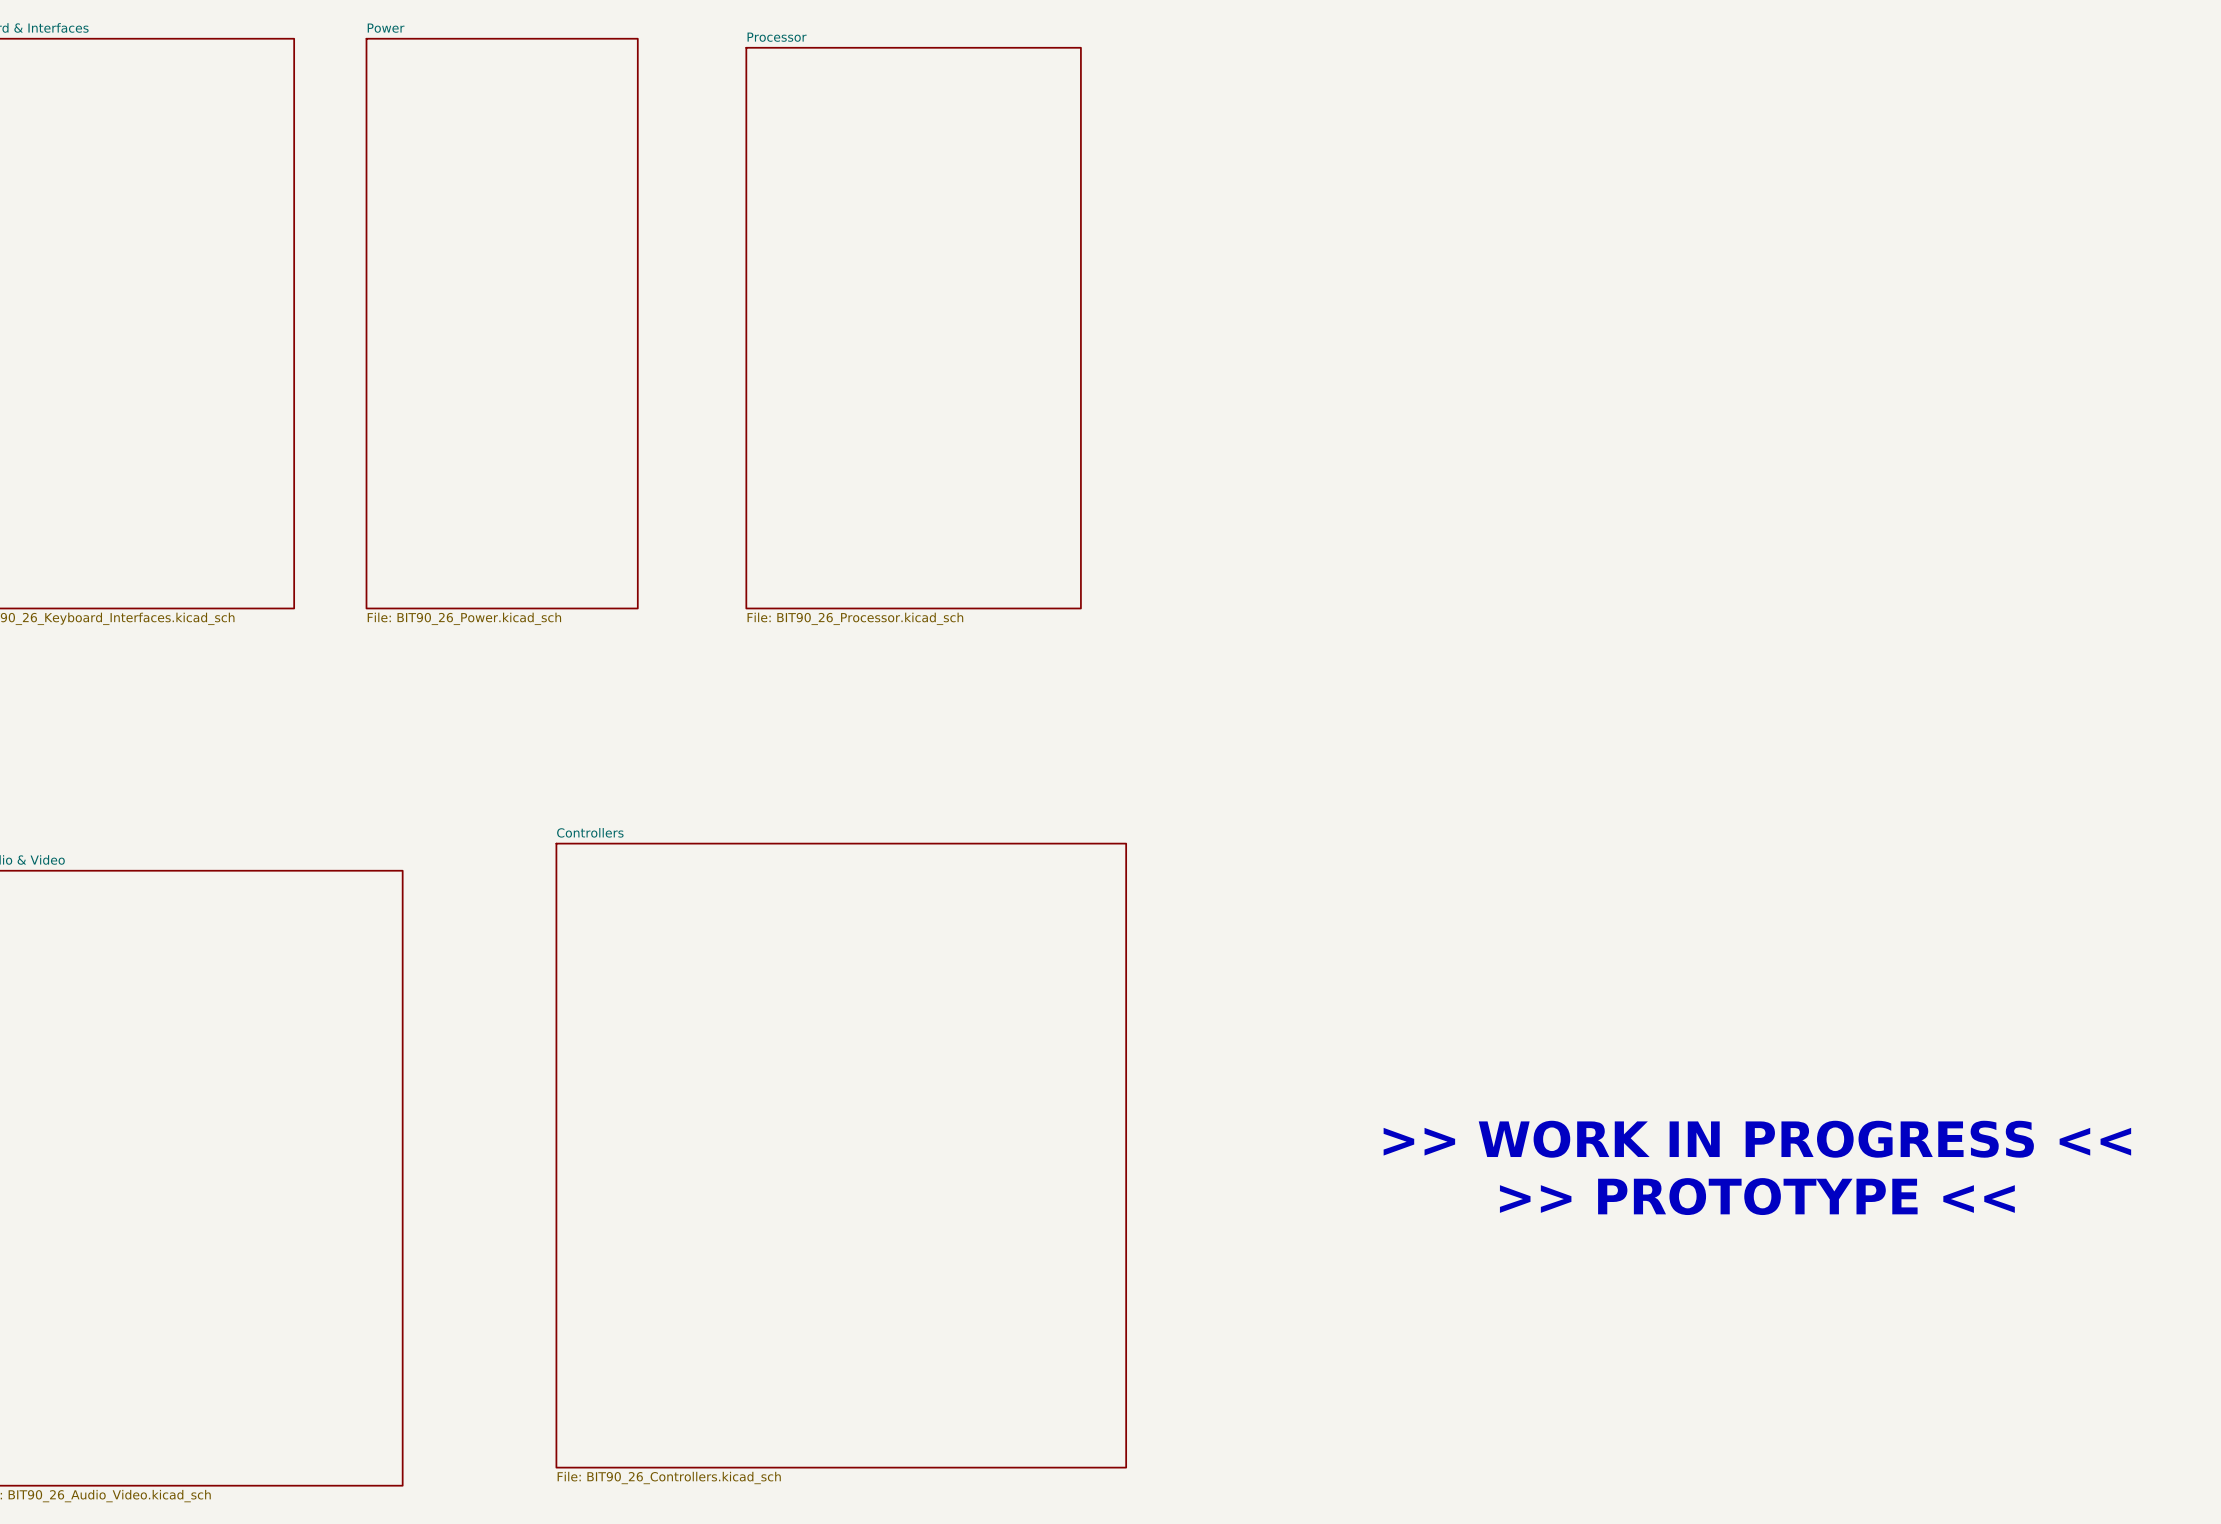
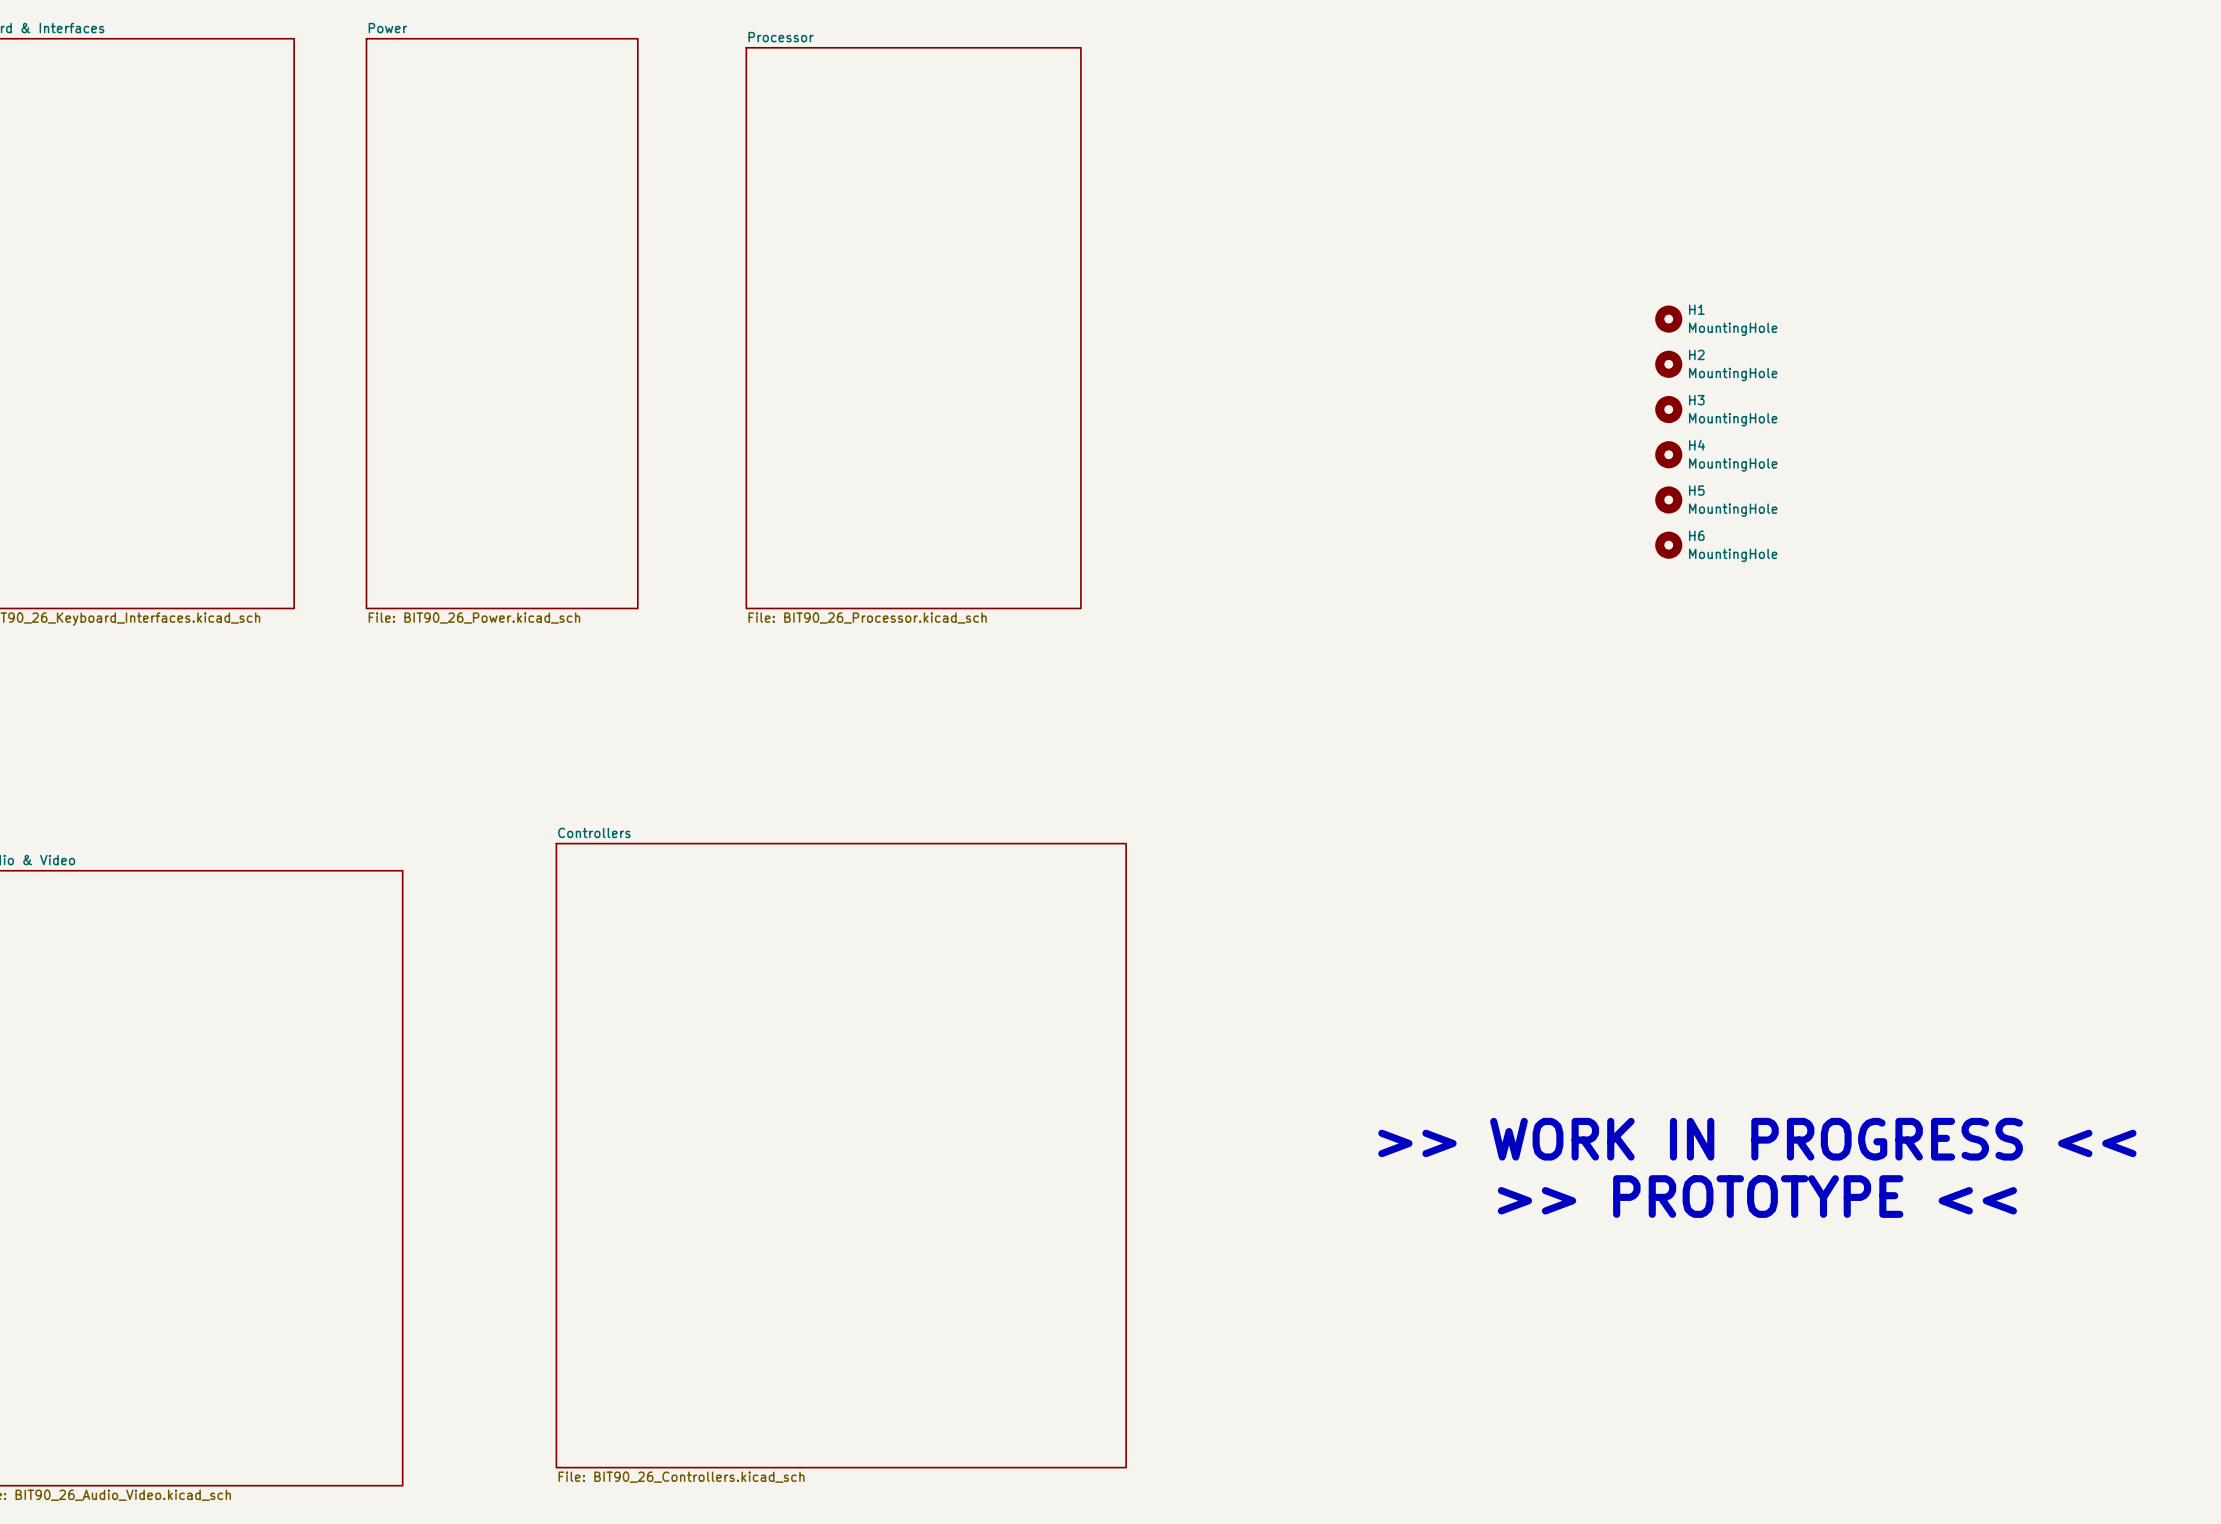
H1: none -> MountingHole (1668, 319)
H2: none -> MountingHole (1668, 364)
H3: none -> MountingHole (1668, 409)
H4: none -> MountingHole (1668, 454)
H5: none -> MountingHole (1668, 499)
H6: none -> MountingHole (1668, 545)

